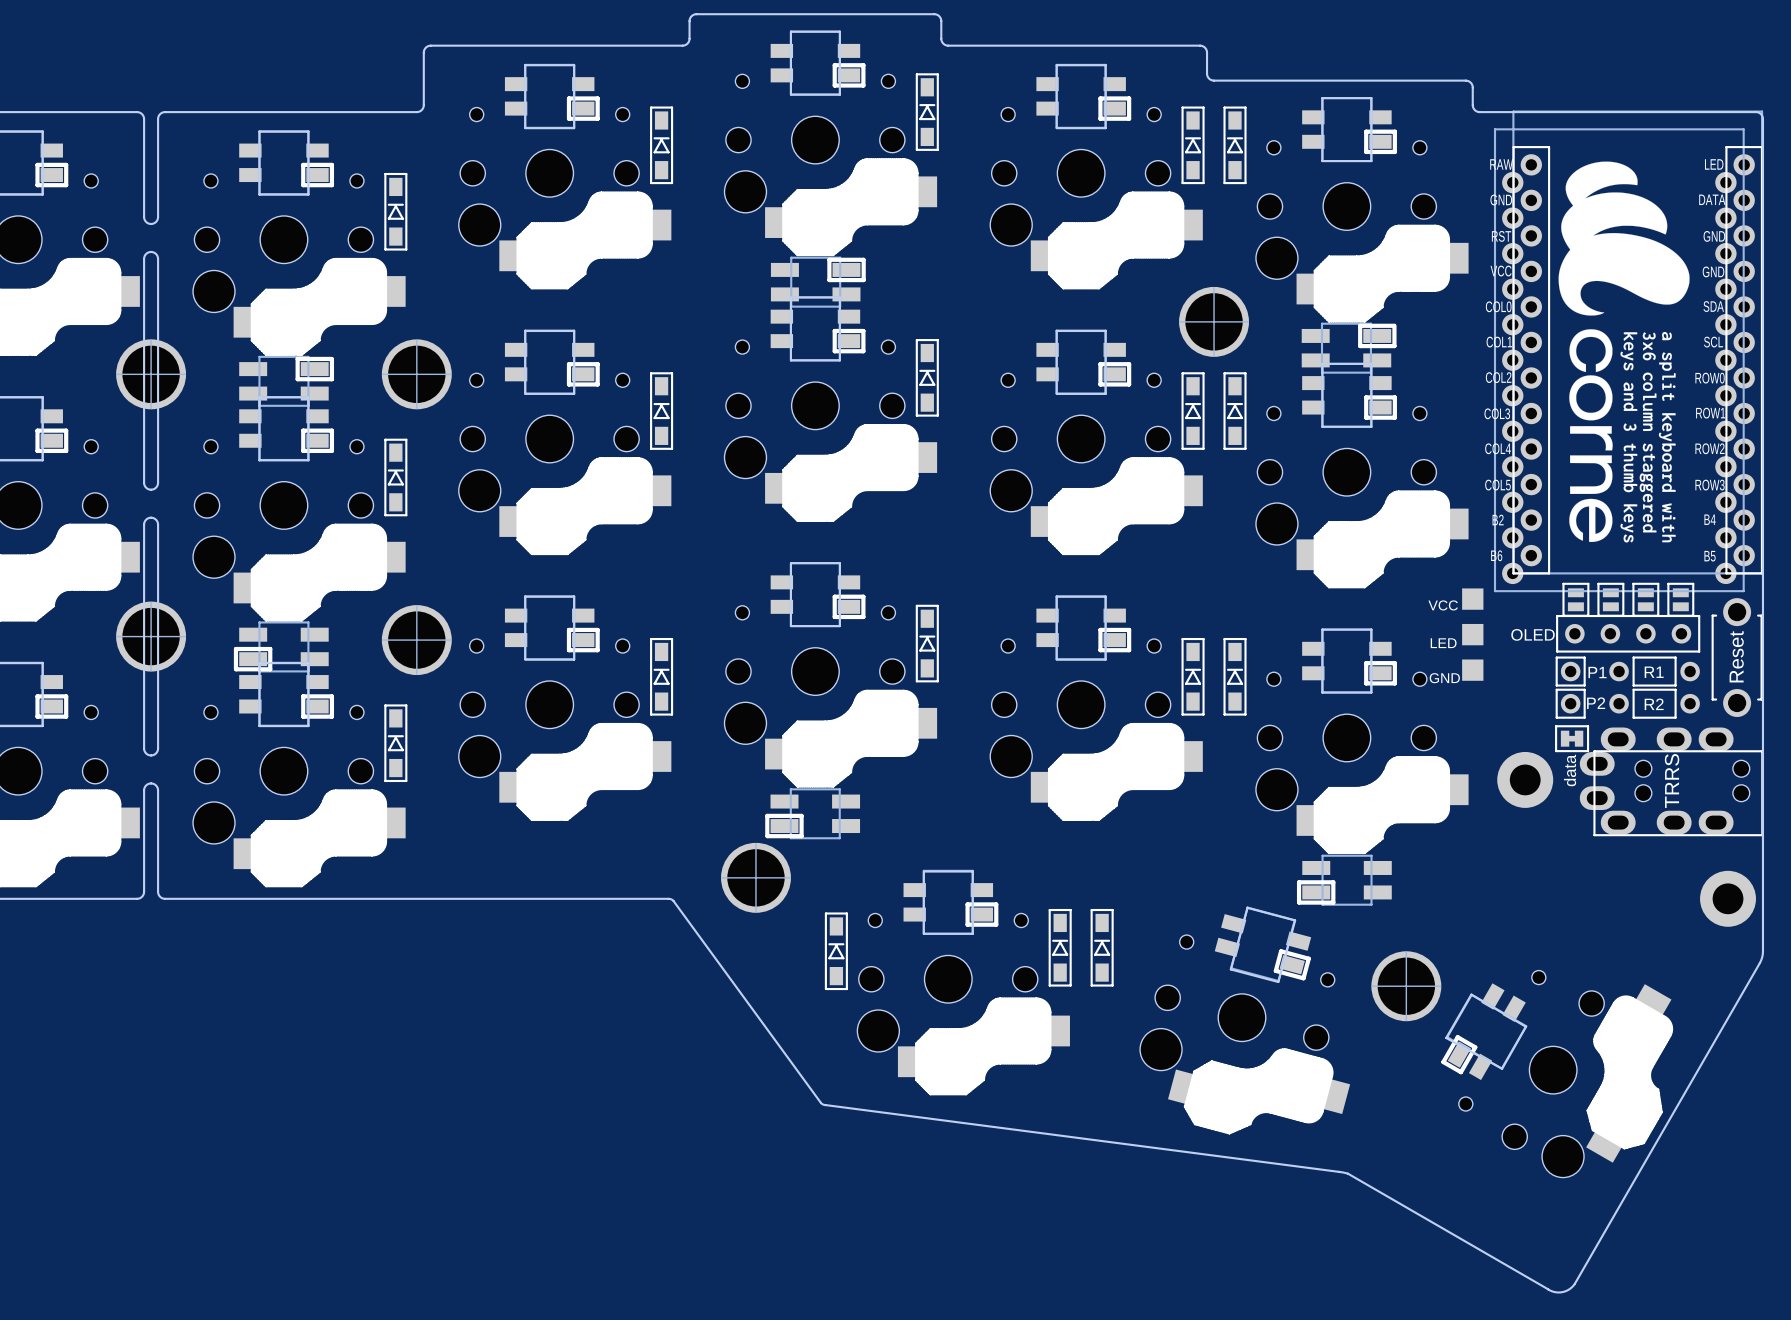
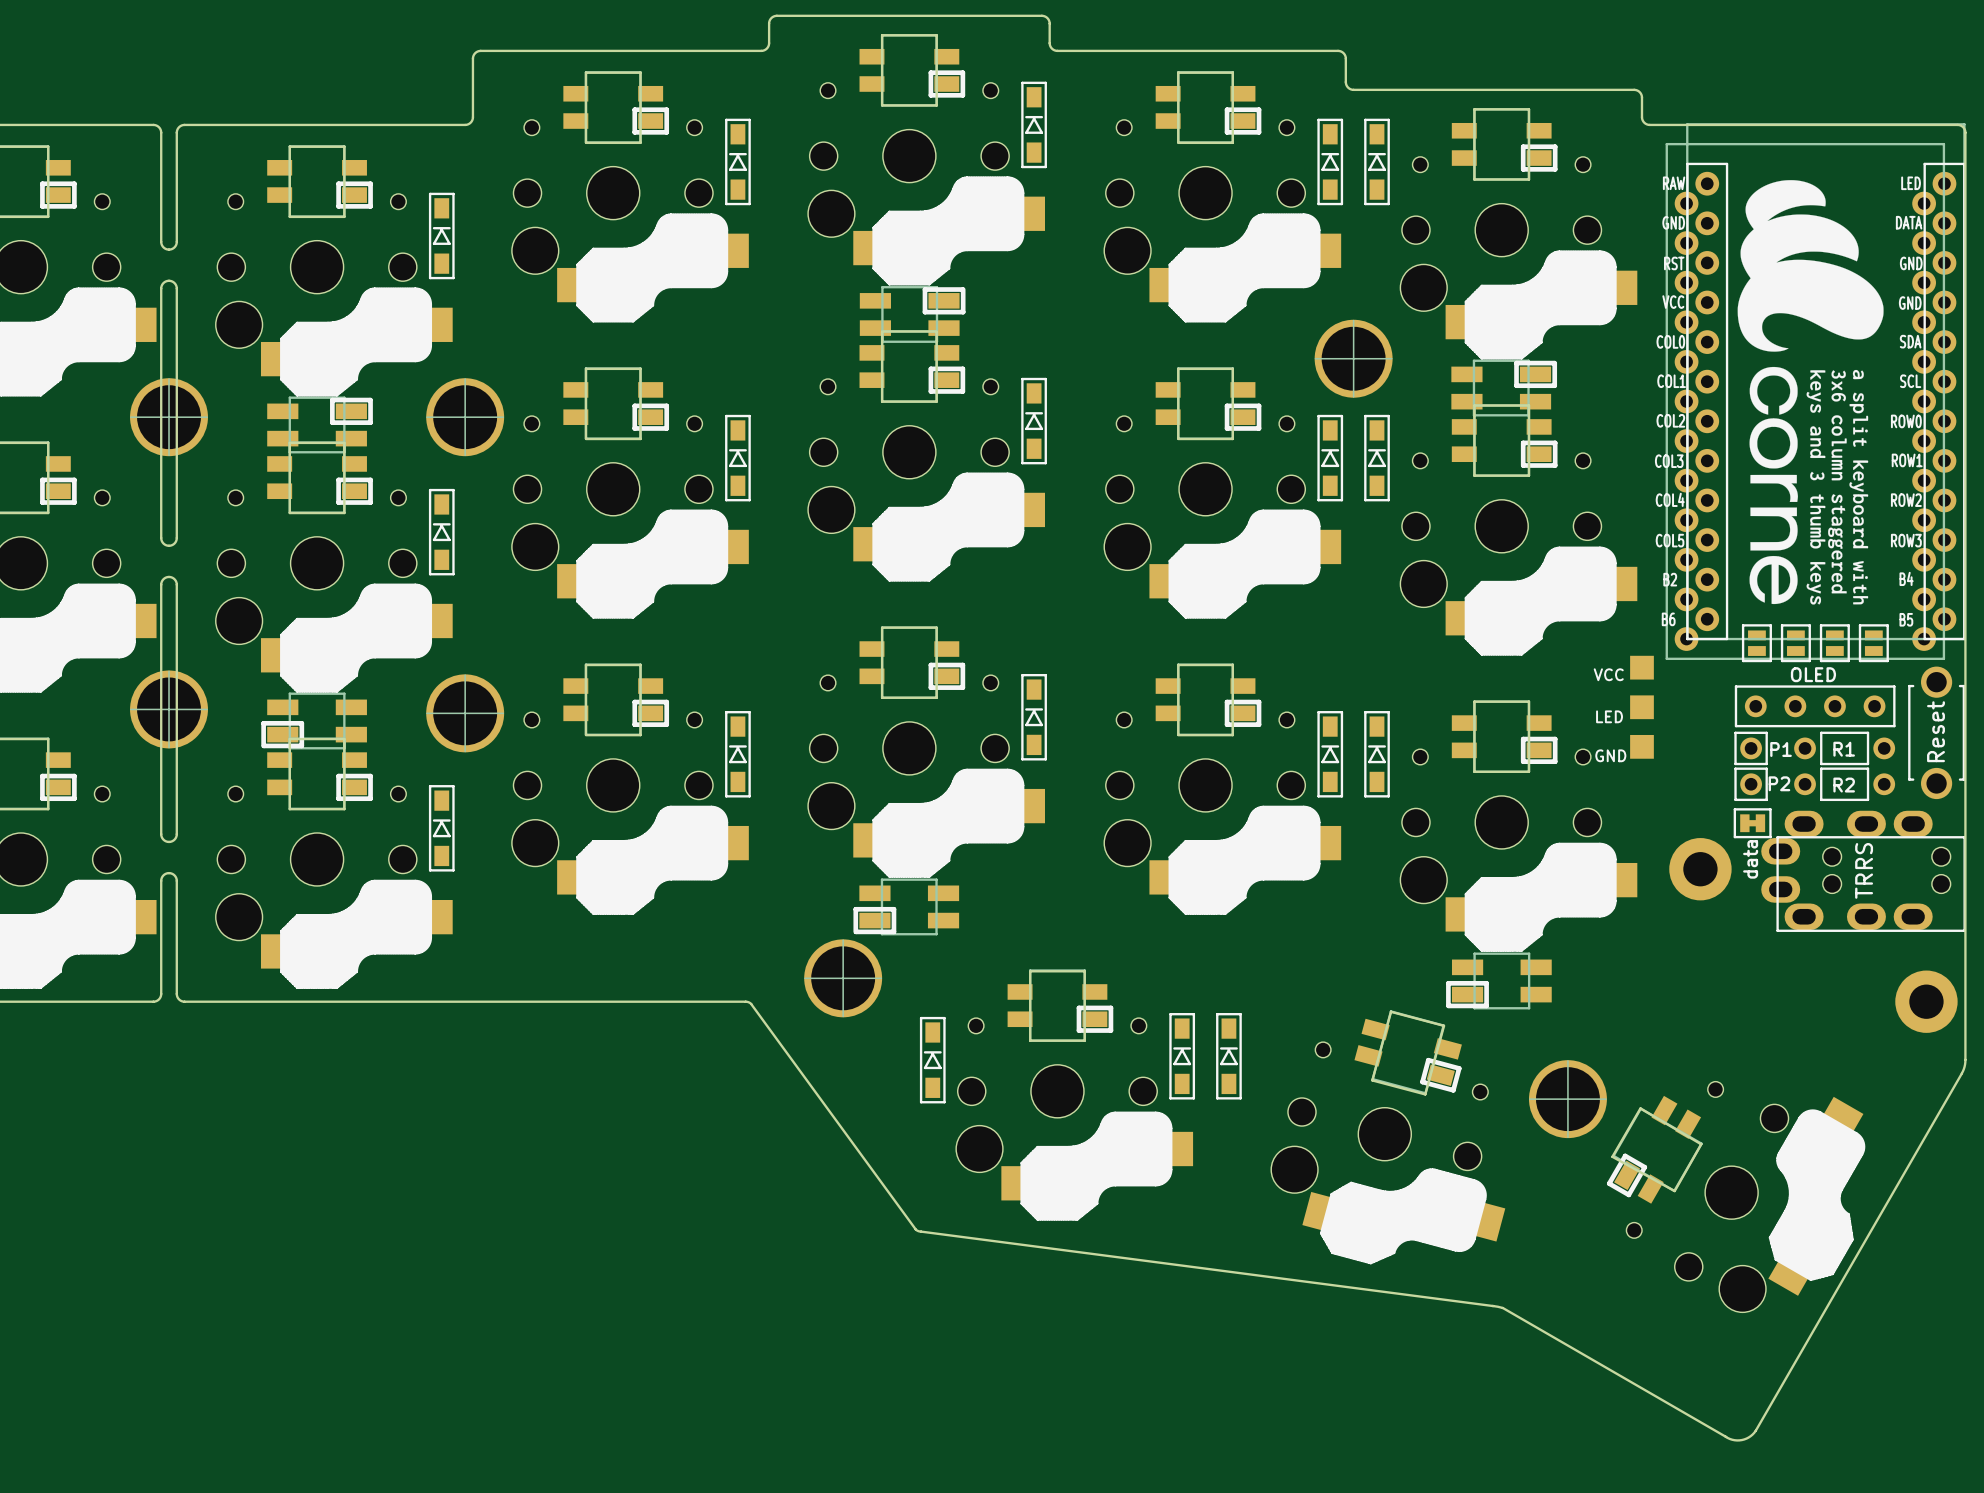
part: none -> (1756, 643)
part: none -> (1795, 643)
part: none -> (1834, 643)
part: none -> (1873, 643)
part: (1575, 599) -> none
part: (1610, 599) -> none
part: (1645, 599) -> none
part: (1680, 599) -> none
OLED name position: OLED (1533, 634) -> OLED (1813, 674)

